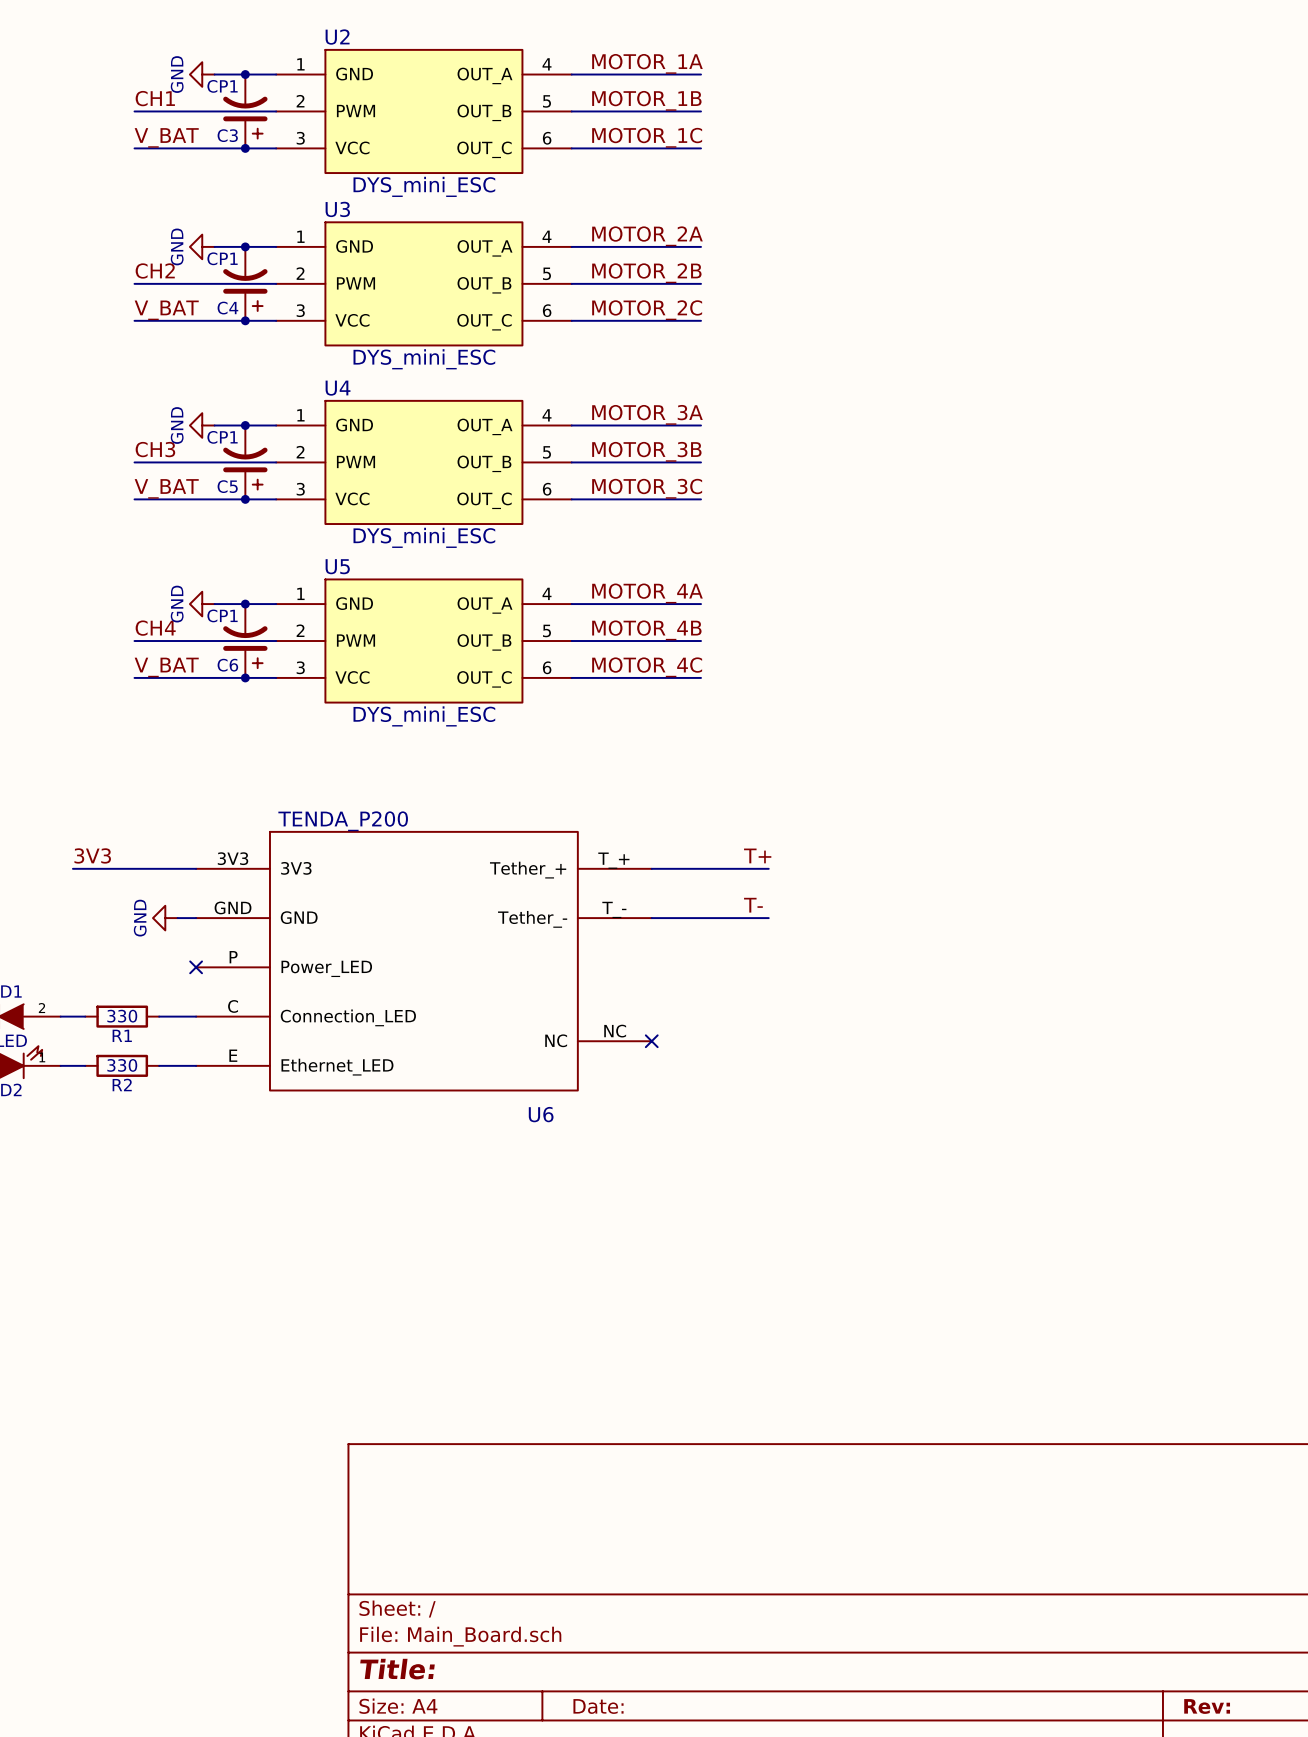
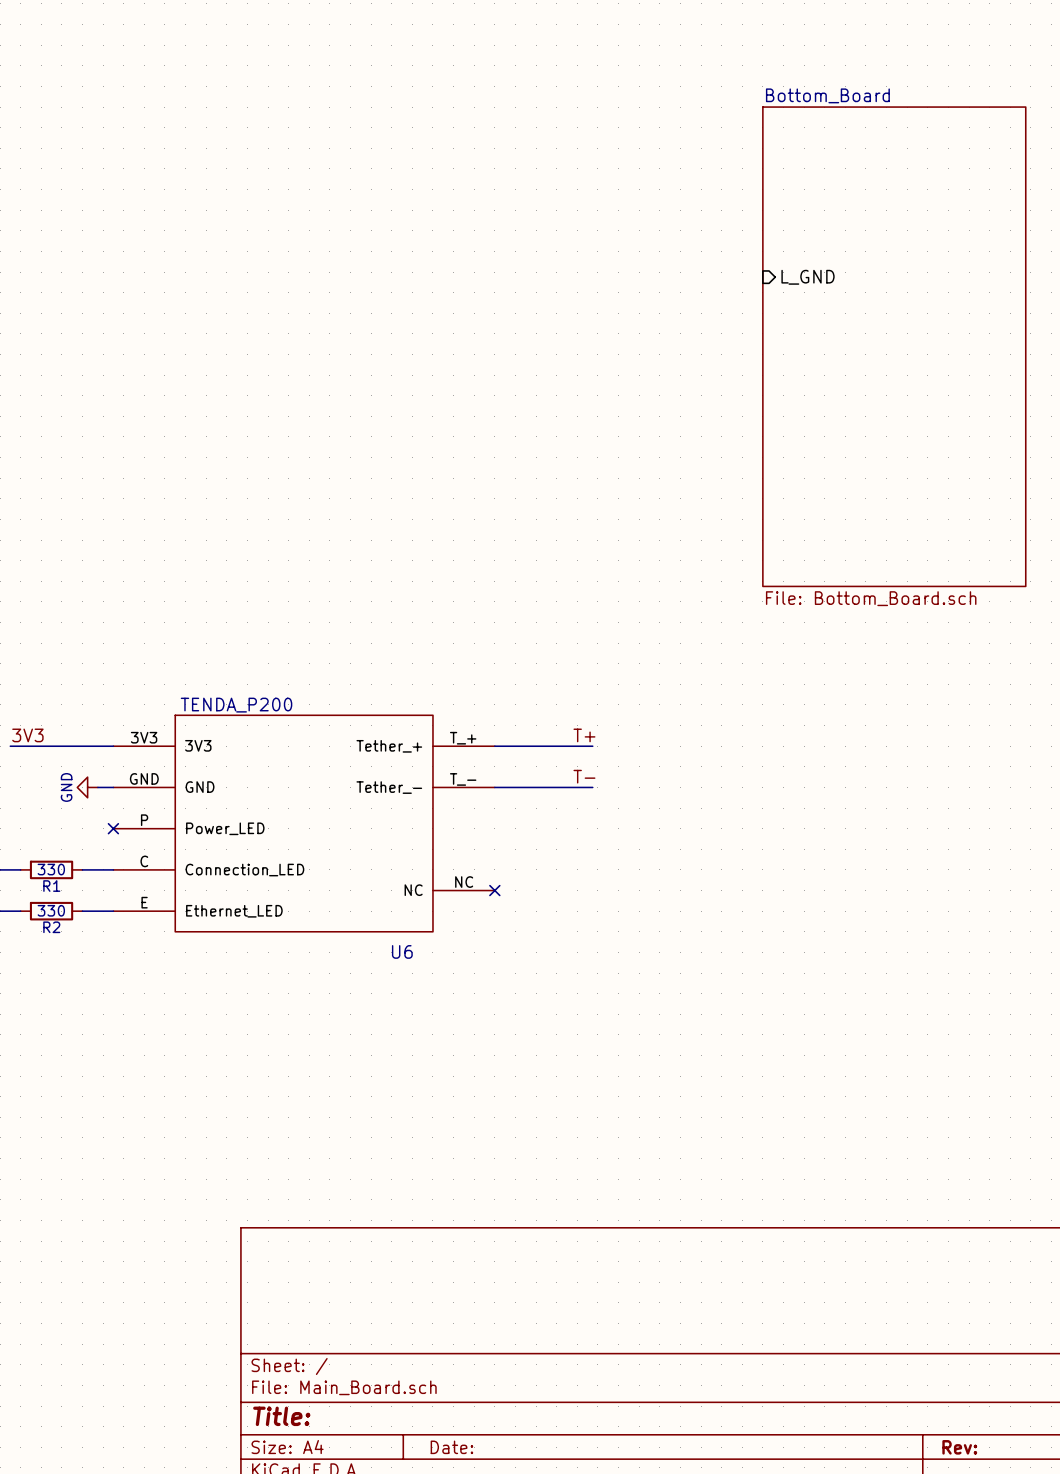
label: MOTOR_1A (647, 63) -> none
power symbol: GND (202, 74) -> none
wire: (214, 74) (276, 74) -> none
junction: (245, 74) -> none
wire: (571, 74) (701, 74) -> none
label: CH1 (155, 98) -> none
label: MOTOR_1B (646, 100) -> none
wire: (134, 111) (276, 111) -> none
C3: CP1 (245, 111) -> none
U2: DYS_mini_ESC (423, 111) -> none
wire: (571, 111) (701, 111) -> none
label: V_BAT (166, 137) -> none
label: MOTOR_1C (647, 137) -> none
wire: (134, 148) (276, 148) -> none
junction: (245, 148) -> none
wire: (571, 148) (701, 148) -> none
label: MOTOR_2A (647, 236) -> none
power symbol: GND (202, 246) -> none
wire: (214, 246) (276, 246) -> none
junction: (245, 246) -> none
wire: (571, 246) (701, 246) -> none
label: CH2 (155, 270) -> none
label: MOTOR_2B (646, 273) -> none
wire: (134, 283) (276, 283) -> none
C4: CP1 (245, 283) -> none
U3: DYS_mini_ESC (423, 283) -> none
wire: (571, 283) (701, 283) -> none
label: V_BAT (166, 310) -> none
label: MOTOR_2C (647, 310) -> none
sheet pin: none -> L_GND (808, 277)
wire: (134, 320) (276, 320) -> none
junction: (245, 320) -> none
wire: (571, 320) (701, 320) -> none
sheet Bottom_Board: none -> File: Bottom_Board.sch (894, 346)
label: MOTOR_3A (647, 414) -> none
power symbol: GND (202, 425) -> none
wire: (214, 425) (276, 425) -> none
junction: (245, 425) -> none
wire: (571, 425) (701, 425) -> none
label: CH3 (155, 449) -> none
label: MOTOR_3B (646, 451) -> none
wire: (134, 462) (276, 462) -> none
C5: CP1 (245, 462) -> none
U4: DYS_mini_ESC (423, 462) -> none
wire: (571, 462) (701, 462) -> none
label: V_BAT (166, 488) -> none
label: MOTOR_3C (647, 488) -> none
wire: (134, 499) (276, 499) -> none
junction: (245, 499) -> none
wire: (571, 499) (701, 499) -> none
label: MOTOR_4A (647, 593) -> none
power symbol: GND (202, 604) -> none
wire: (214, 604) (276, 604) -> none
junction: (245, 604) -> none
wire: (571, 604) (701, 604) -> none
label: CH4 (155, 628) -> none
label: MOTOR_4B (646, 630) -> none
wire: (134, 641) (276, 641) -> none
C6: CP1 (245, 641) -> none
U5: DYS_mini_ESC (423, 641) -> none
wire: (571, 641) (701, 641) -> none
label: V_BAT (166, 667) -> none
label: MOTOR_4C (647, 667) -> none
wire: (134, 677) (276, 677) -> none
junction: (245, 677) -> none
wire: (571, 677) (701, 677) -> none

